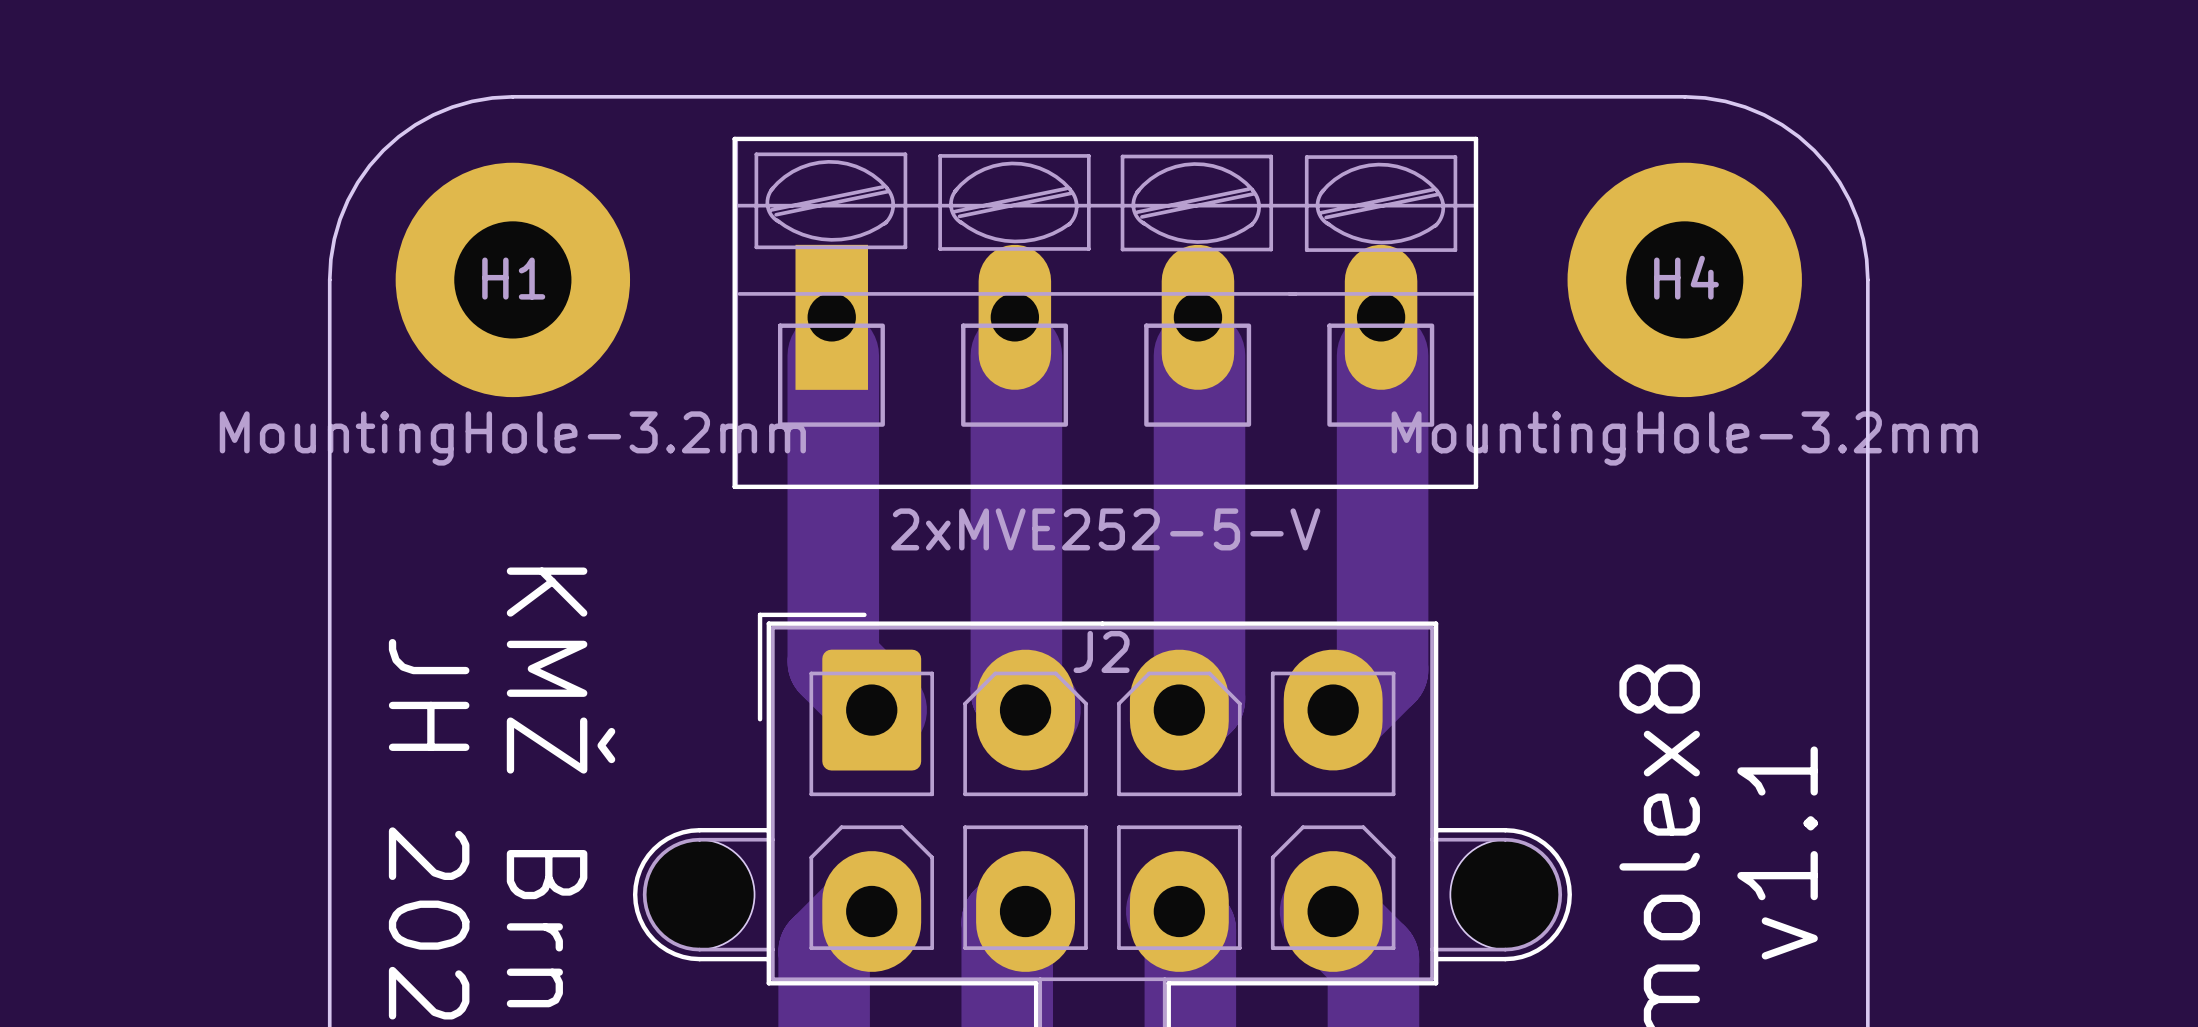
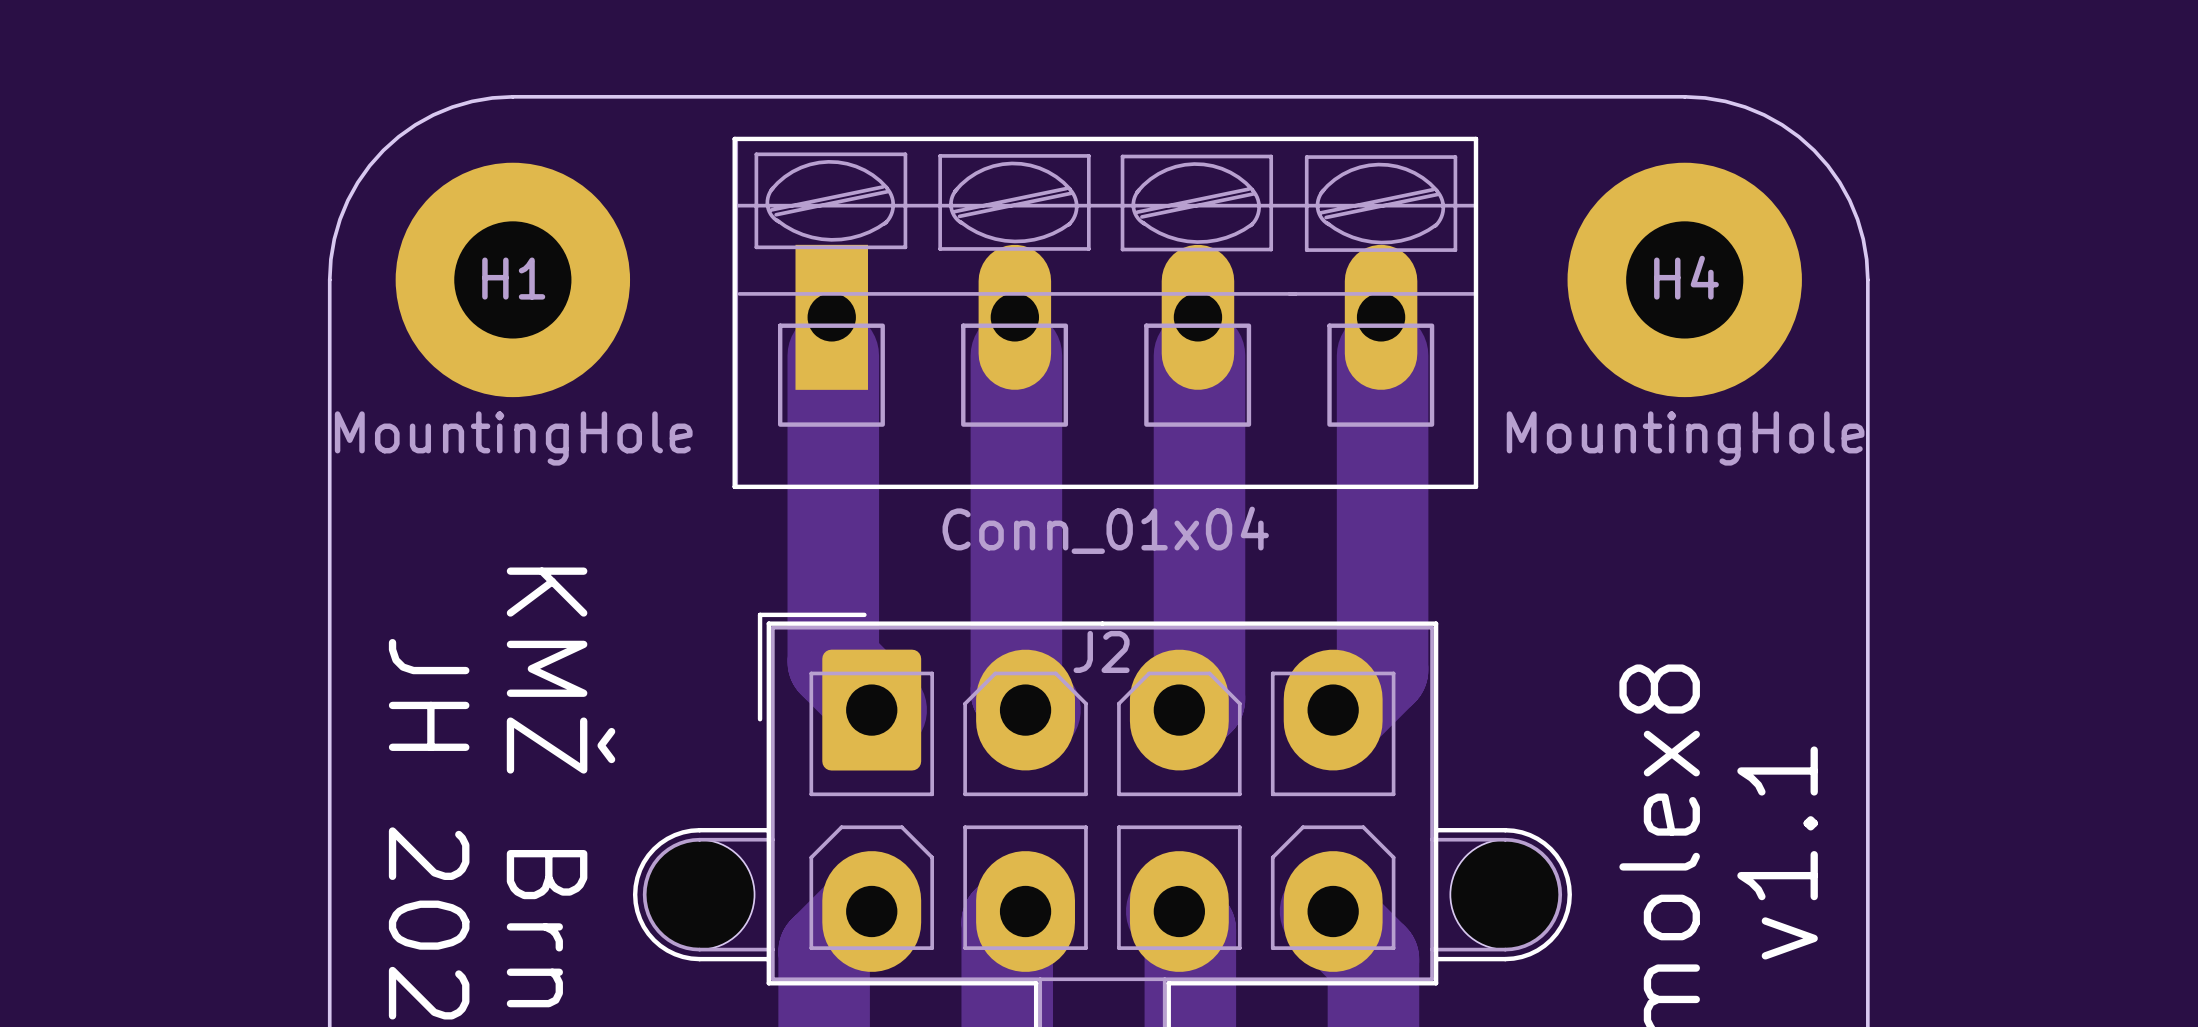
H1 value: MountingHole-3.2mm (512, 438) -> MountingHole (513, 438)
H4 value: MountingHole-3.2mm (1684, 438) -> MountingHole (1685, 438)
part value: 2xMVE252-5-V (1105, 529) -> Conn_01x04 (1105, 530)

